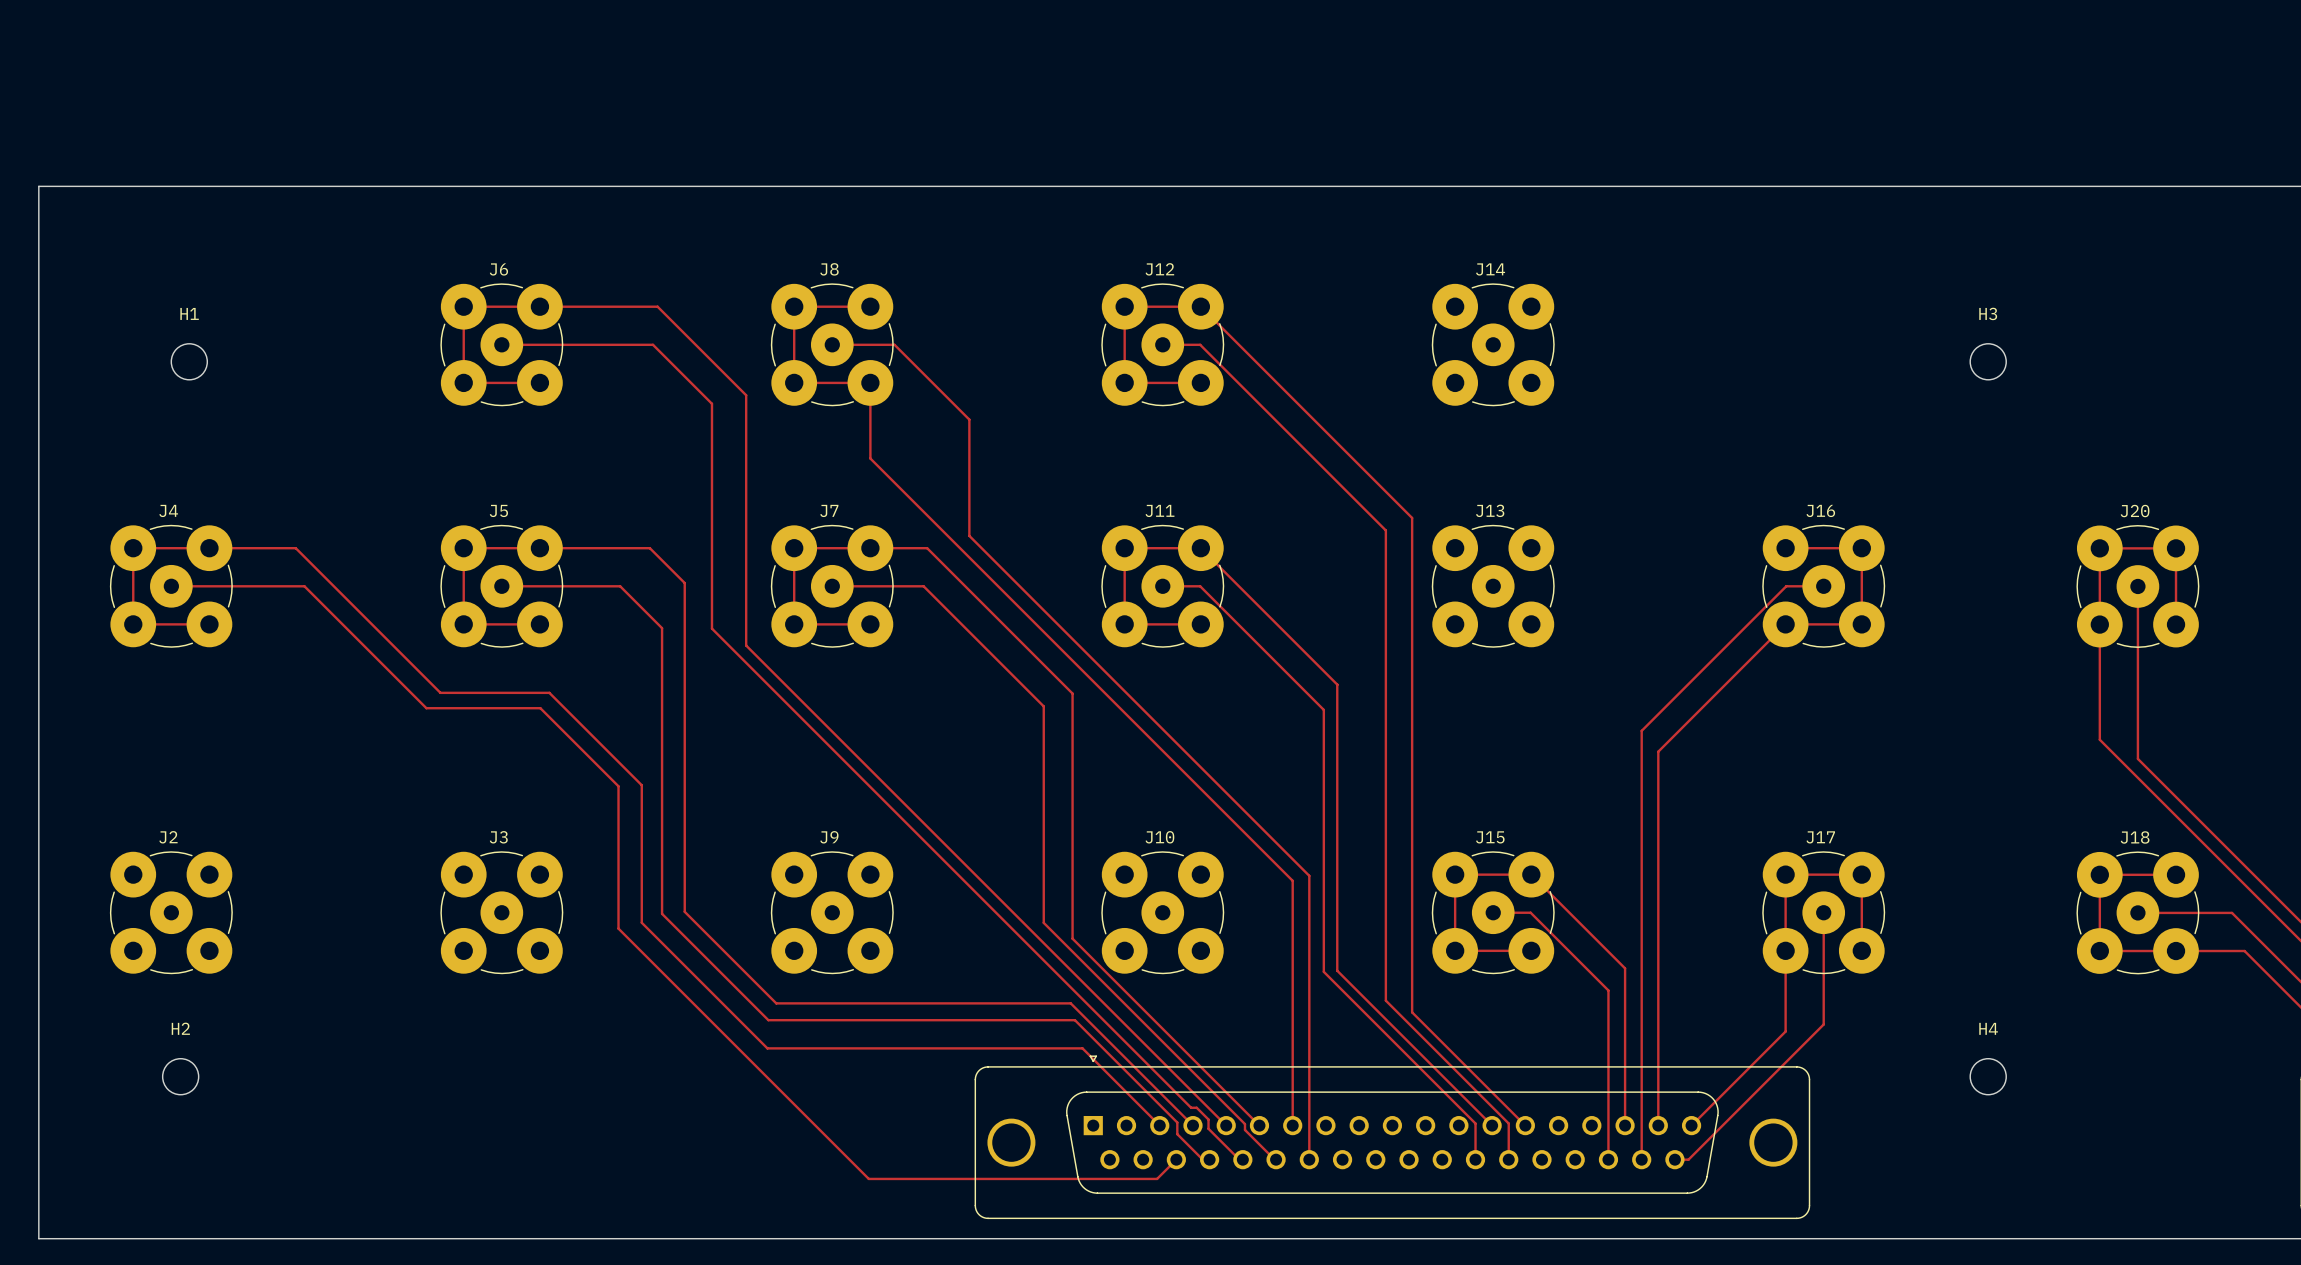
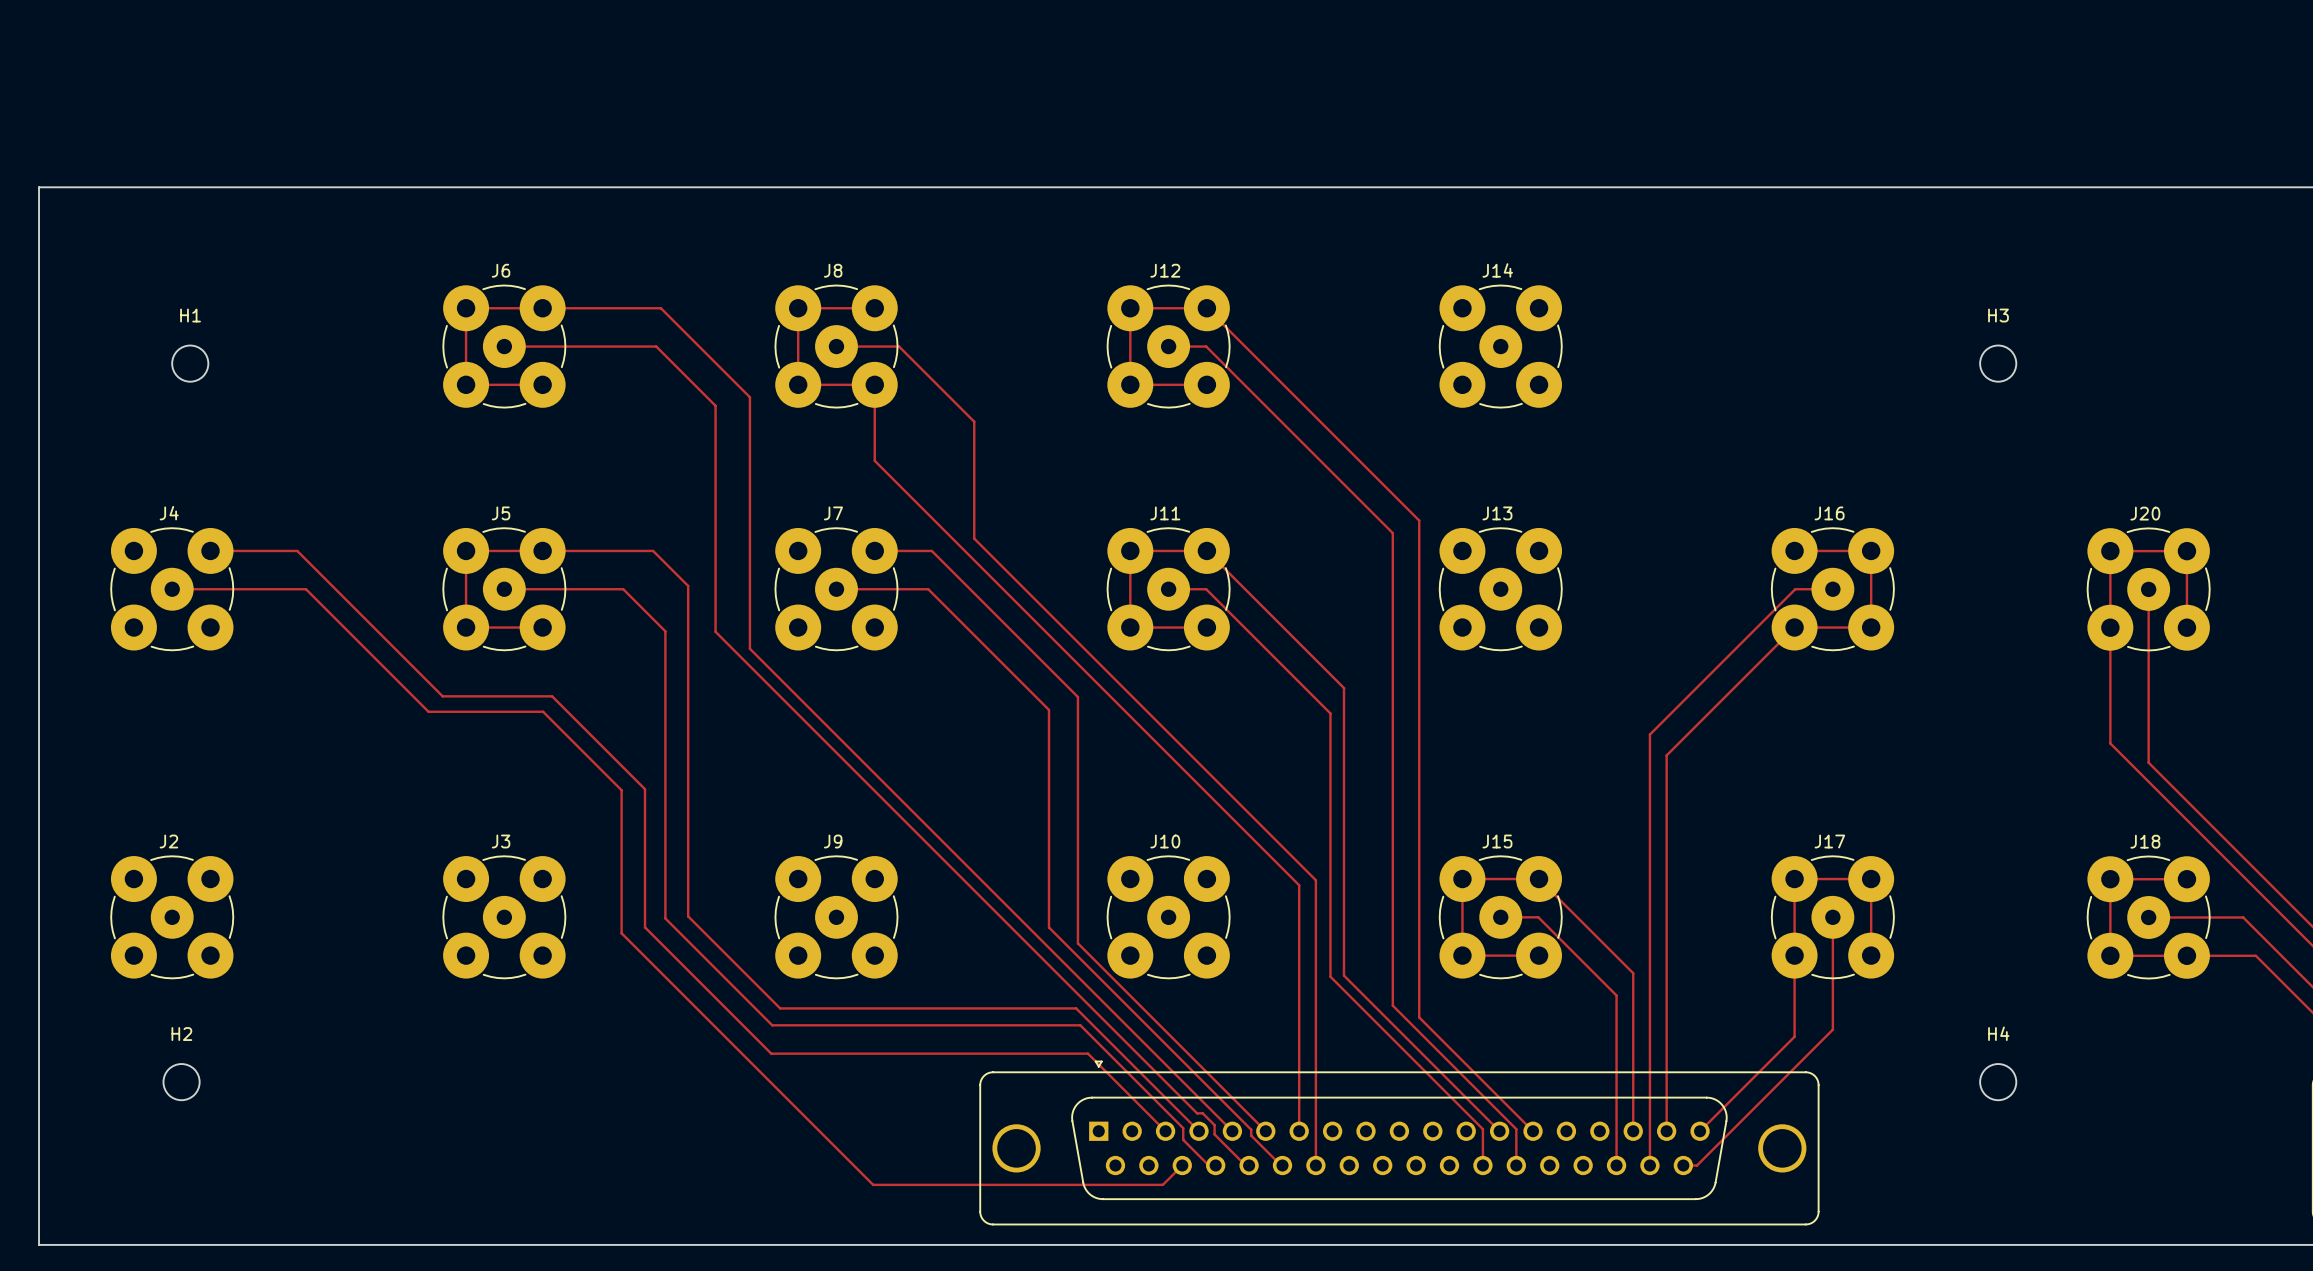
track: (209, 548) (133, 548) (133, 624) (209, 624) -> none
track: (870, 548) (794, 548) (794, 624) (870, 624) -> none

